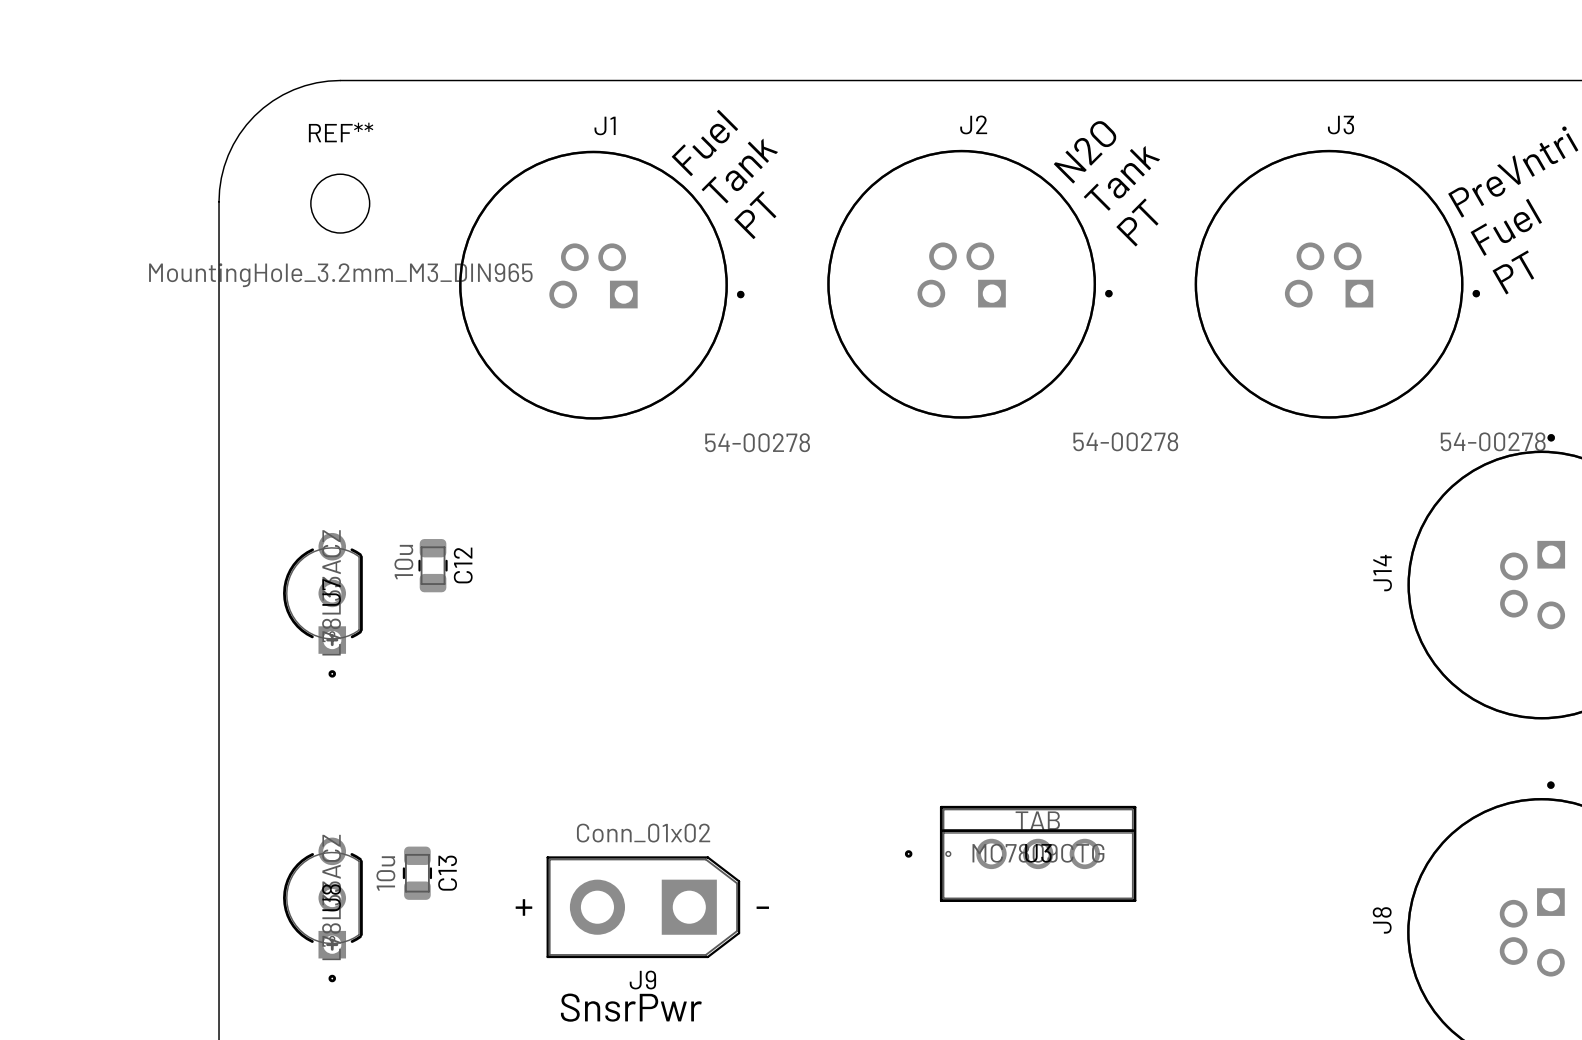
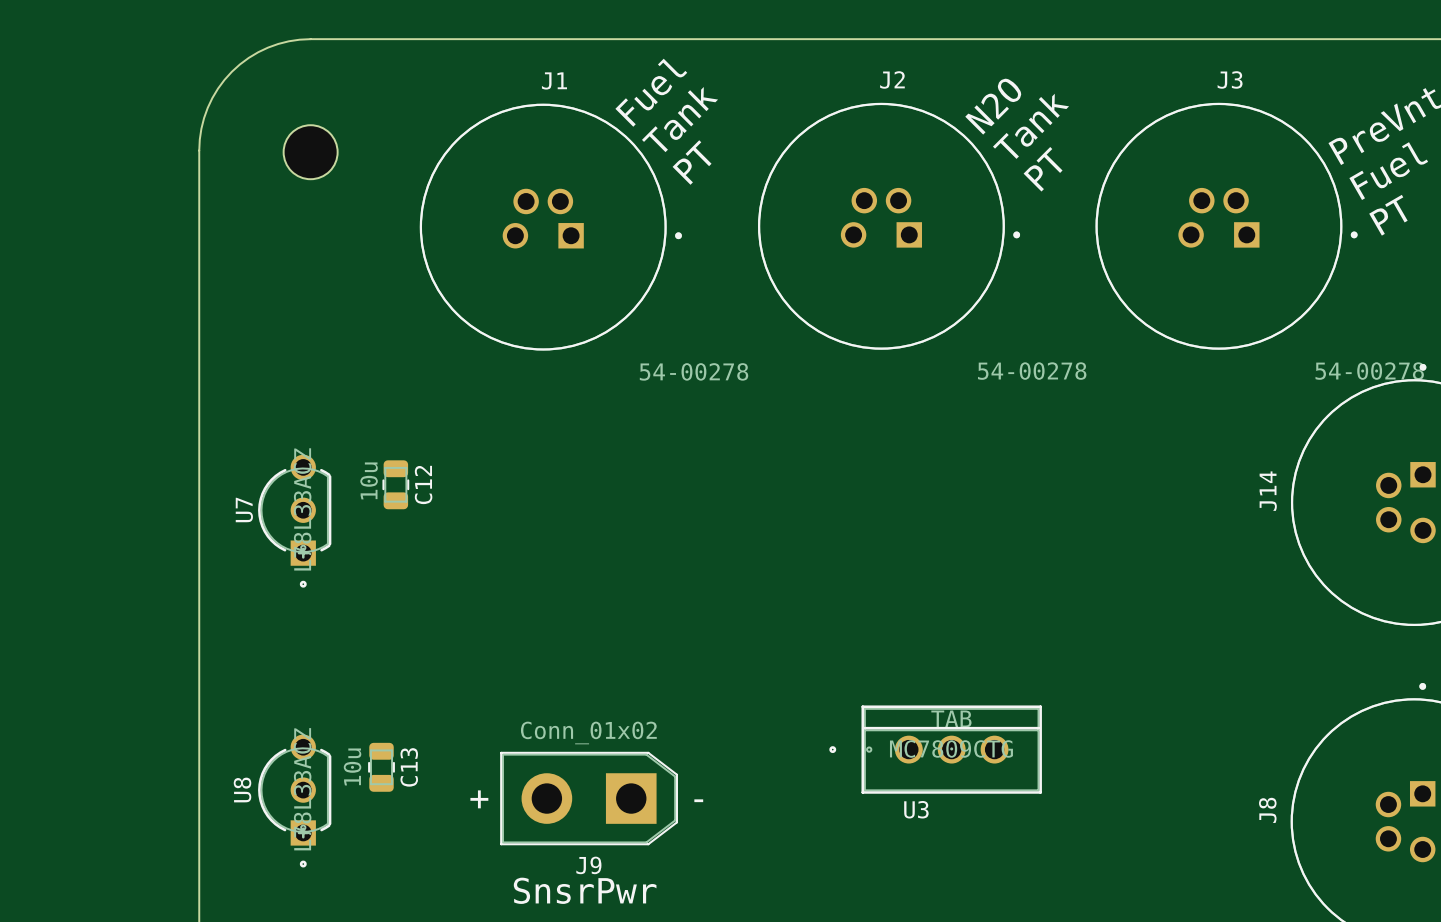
REF** name: REF** (341, 132) -> none
REF** value: MountingHole_3.2mm_M3_DIN965 (340, 275) -> none
U7 name position: U7 (331, 592) -> U7 (244, 510)
U3 name position: U3 (1038, 853) -> U3 (916, 809)
U8 name position: U8 (331, 897) -> U8 (242, 790)

